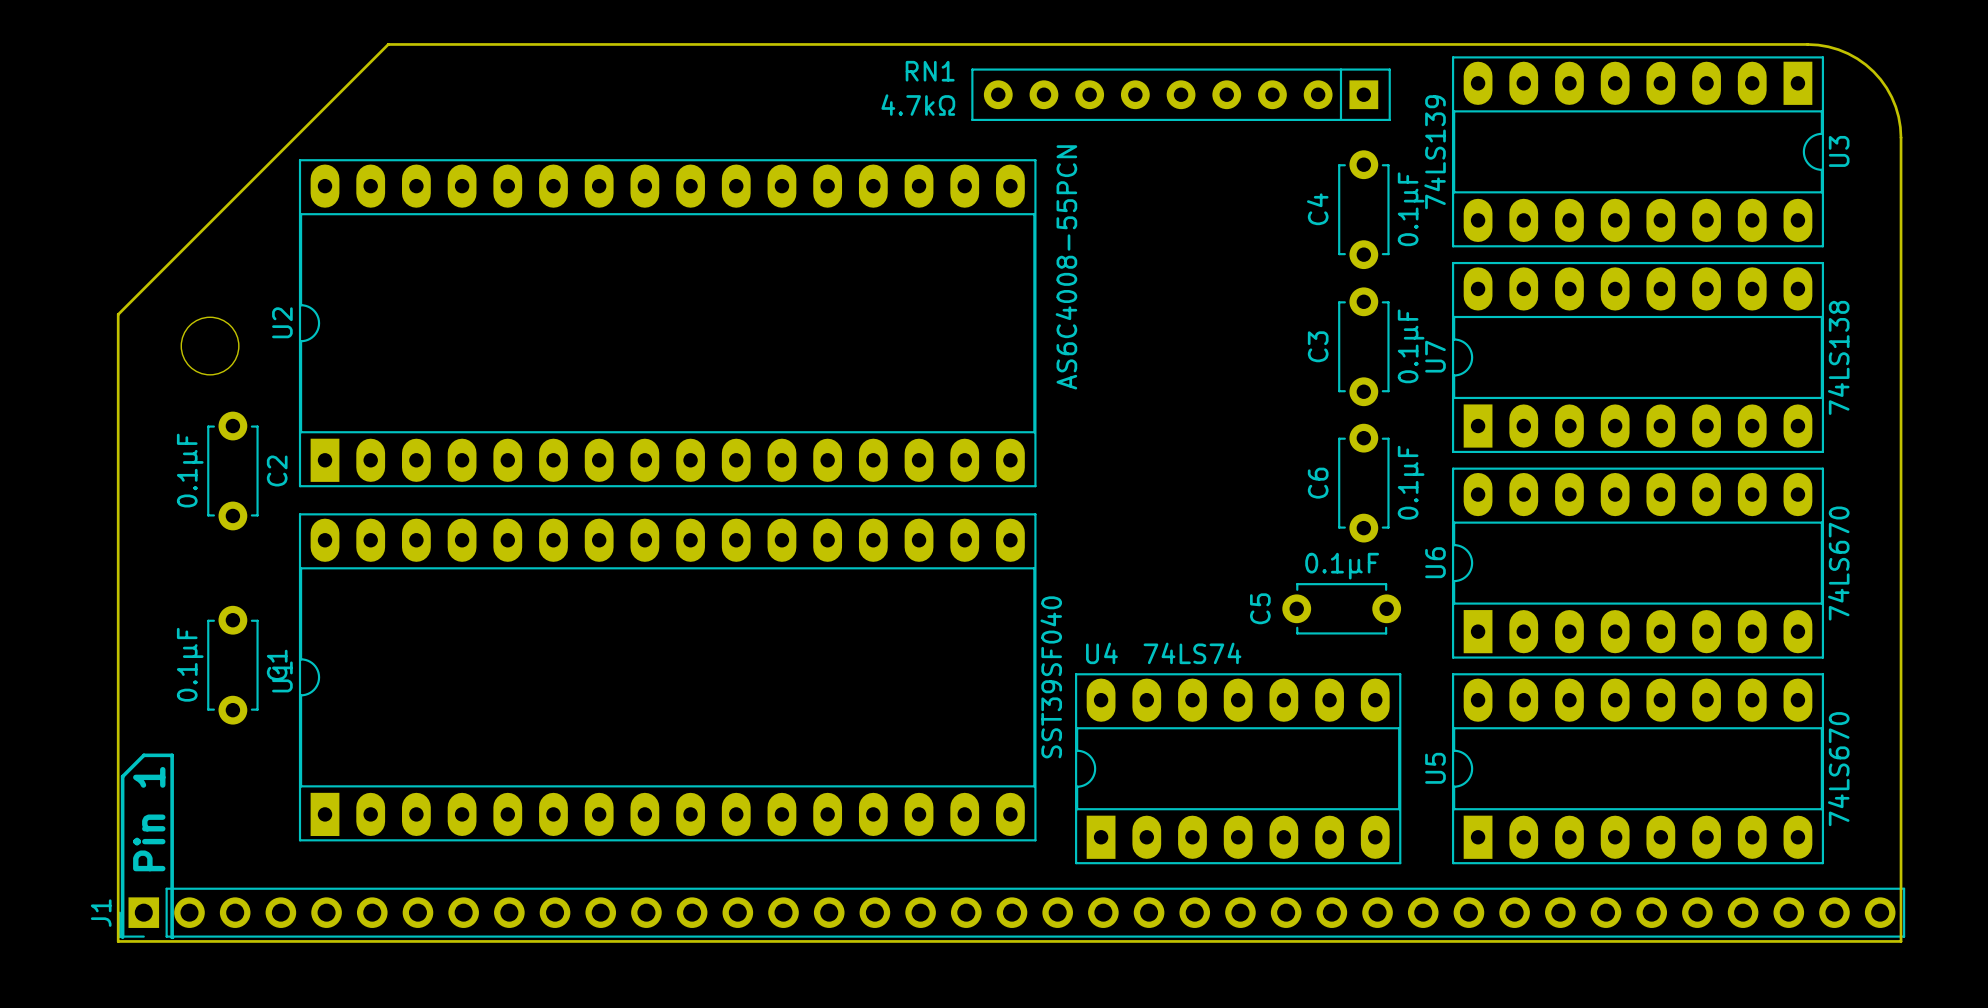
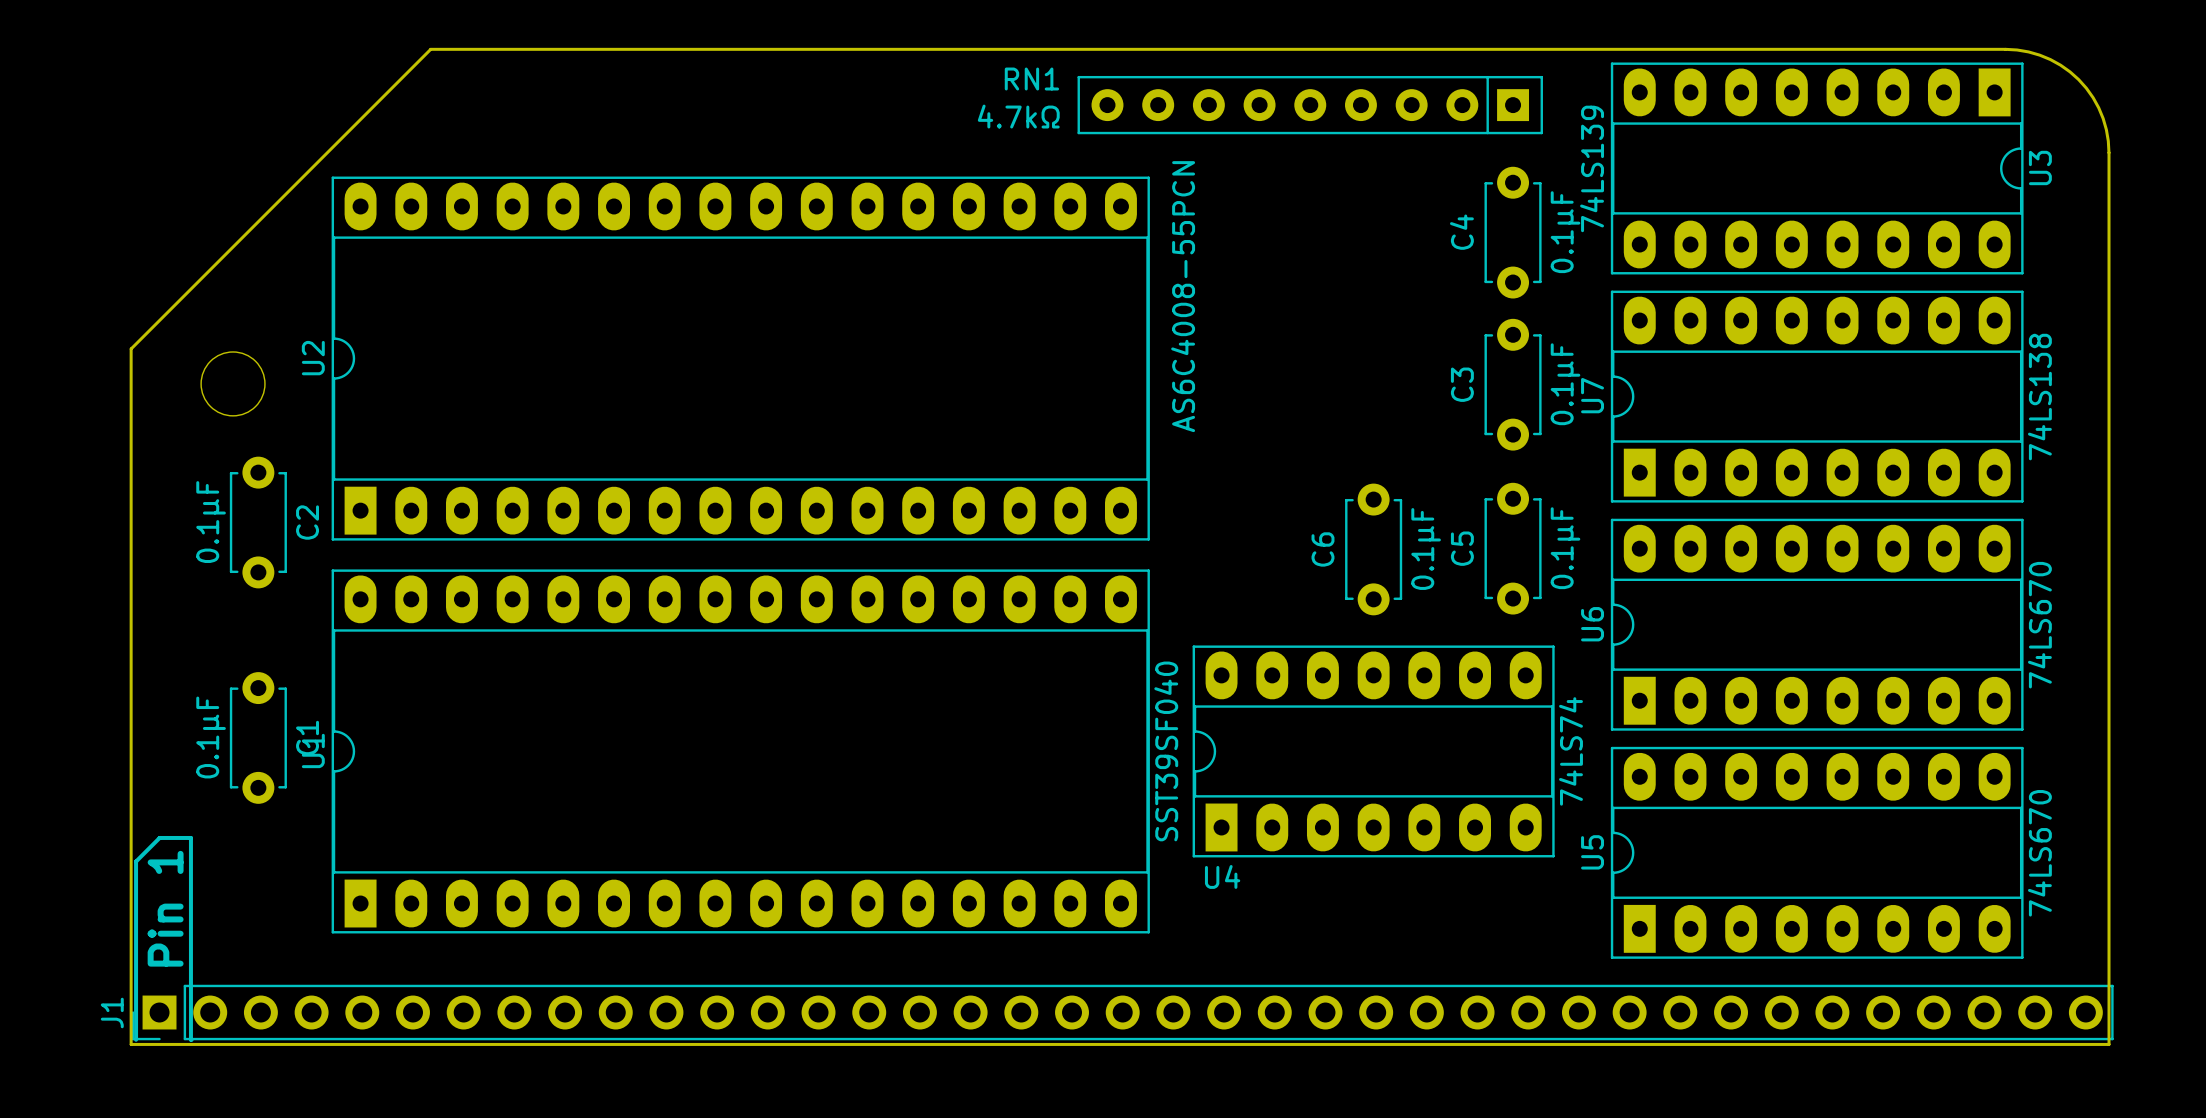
C6 position: (1363, 483) -> (1373, 549)
C5 rotation: 0° (1341, 608) -> 90° clockwise (1513, 548)
C5 position: (1341, 608) -> (1513, 548)
U4 name position: U4 (1101, 653) -> U4 (1222, 876)
U4 value rotation: 0° (1192, 653) -> 90° counterclockwise (1570, 751)
U4 value position: 74LS74 (1192, 653) -> 74LS74 (1570, 751)
U4 position: (1238, 768) -> (1373, 751)

